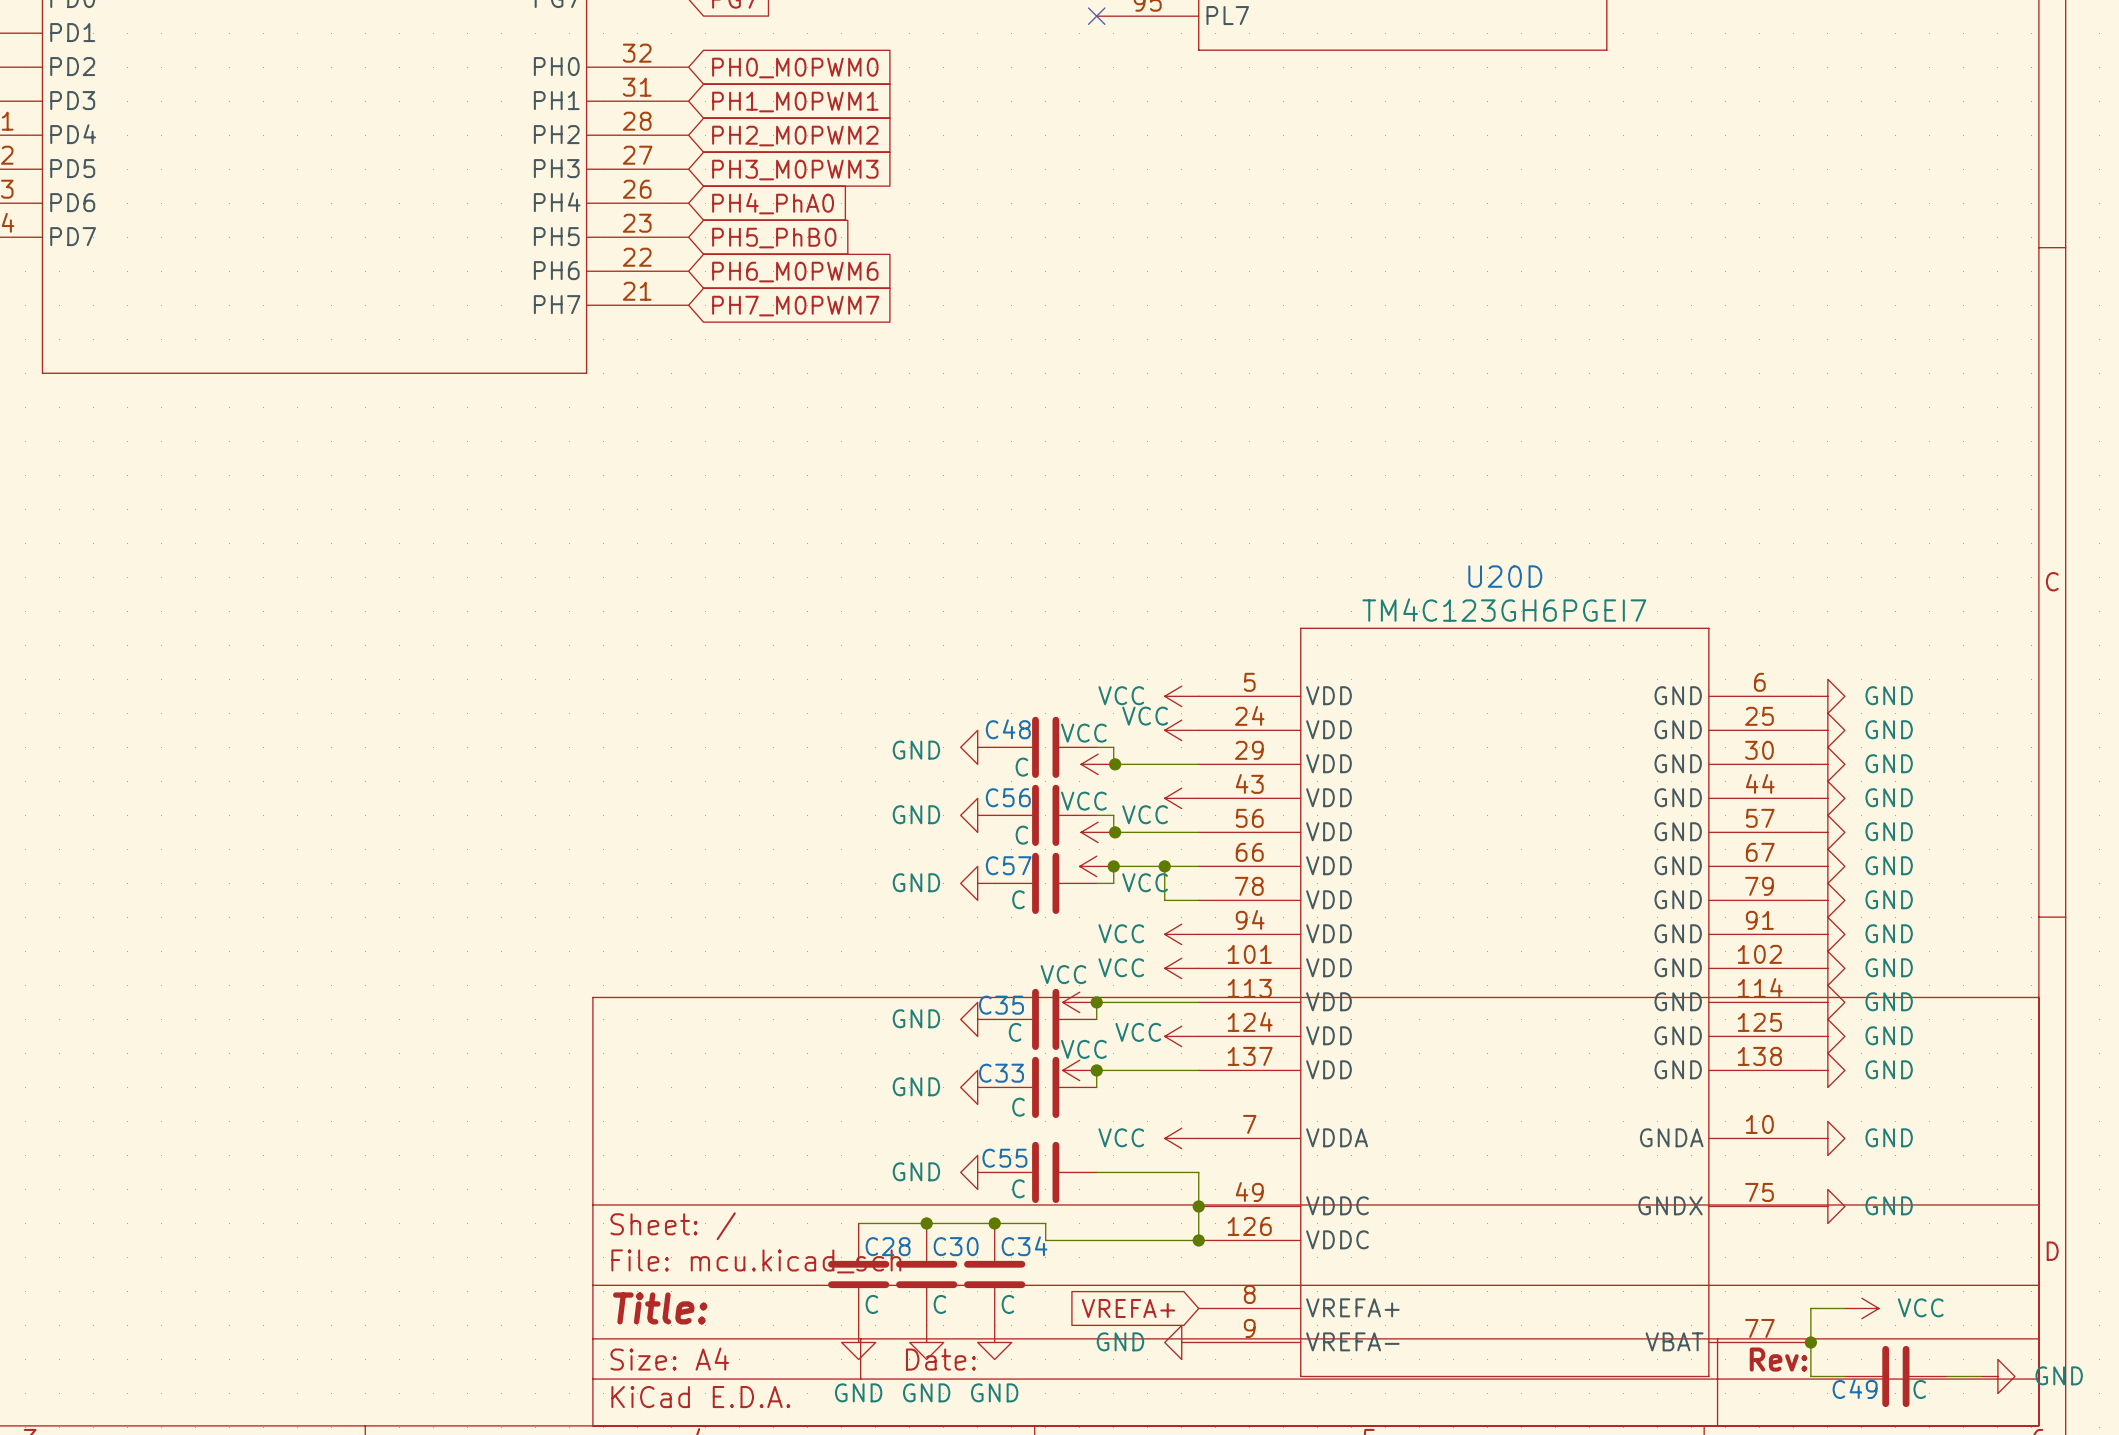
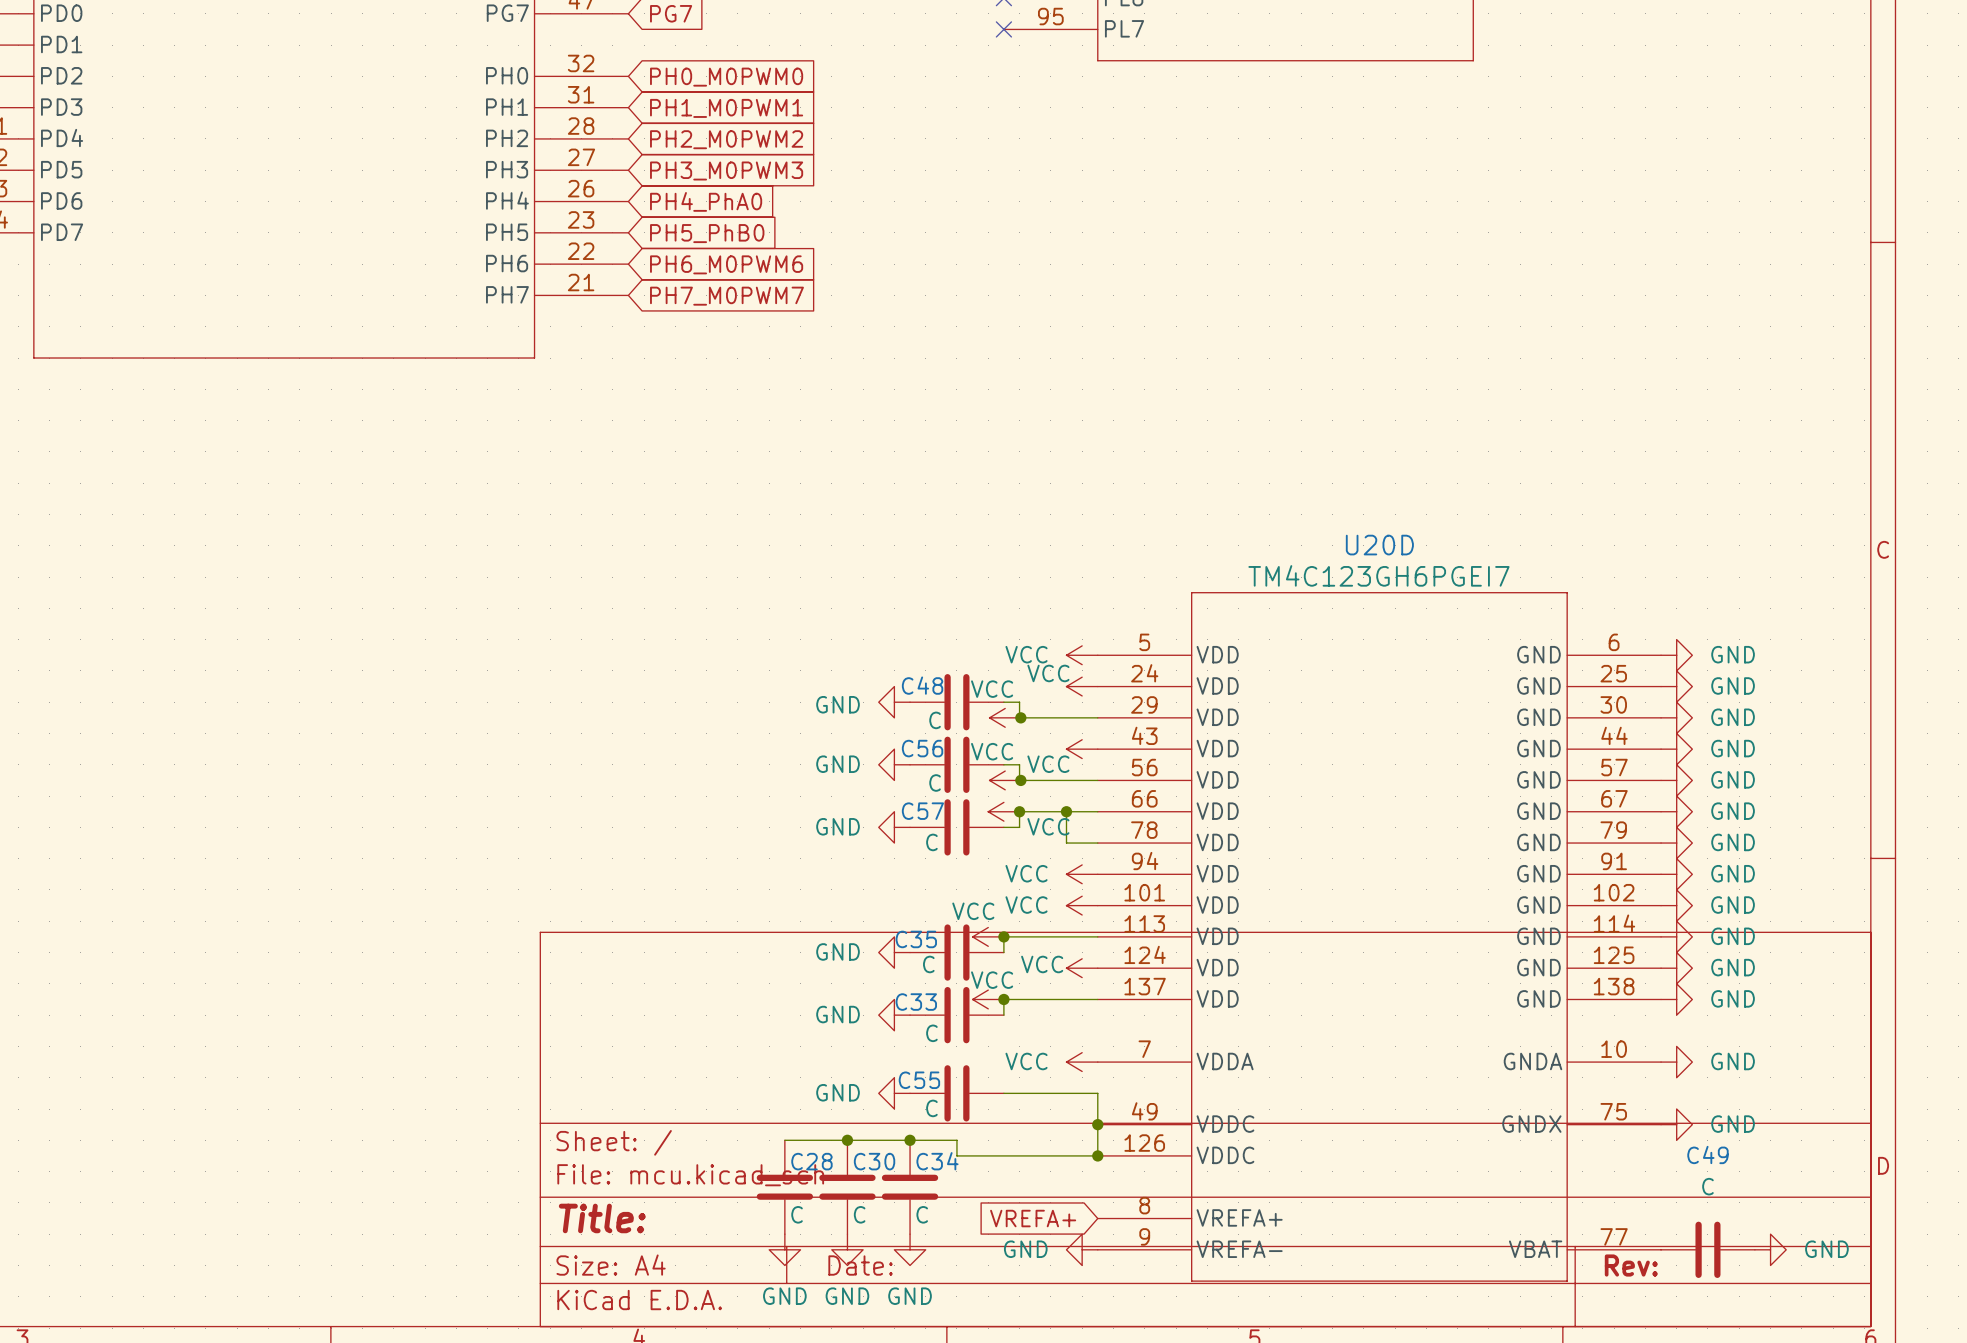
wire: (1844, 1308) (1810, 1308) (1810, 1376) (1844, 1376) -> none
power symbol: VCC (1861, 1308) -> none
junction: (1810, 1342) -> none
C49 position: (1895, 1376) -> (1707, 1249)
wire: (1946, 1376) (1980, 1376) -> none
power symbol position: GND (1997, 1376) -> GND (1770, 1249)
C49 name position: C49 (1855, 1389) -> C49 (1707, 1154)
C49 value position: C (1919, 1389) -> C (1707, 1186)

